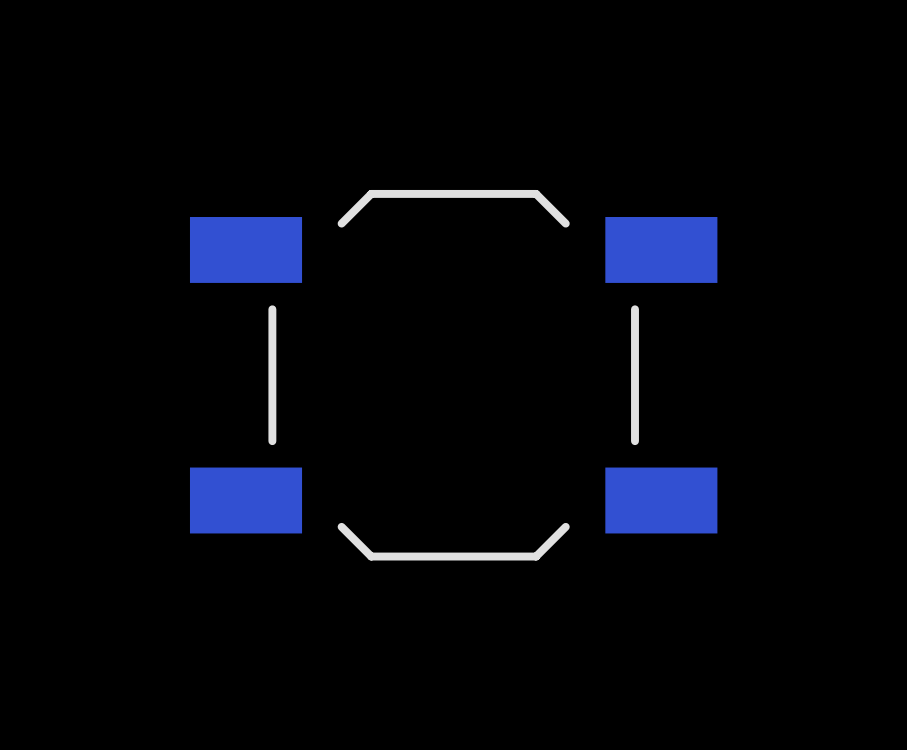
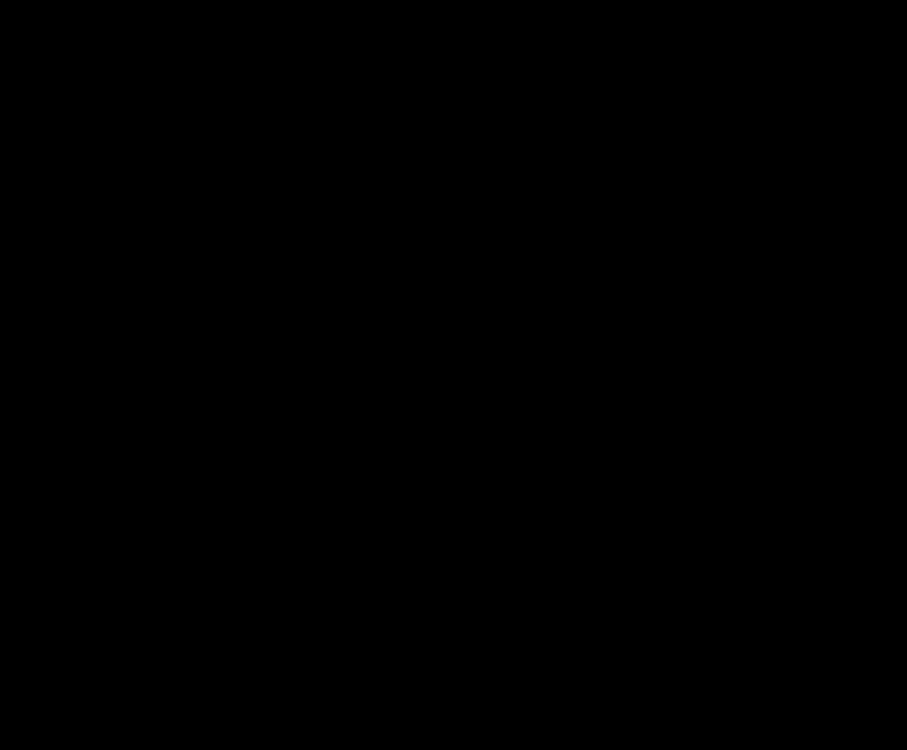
part: (453, 375) -> none

